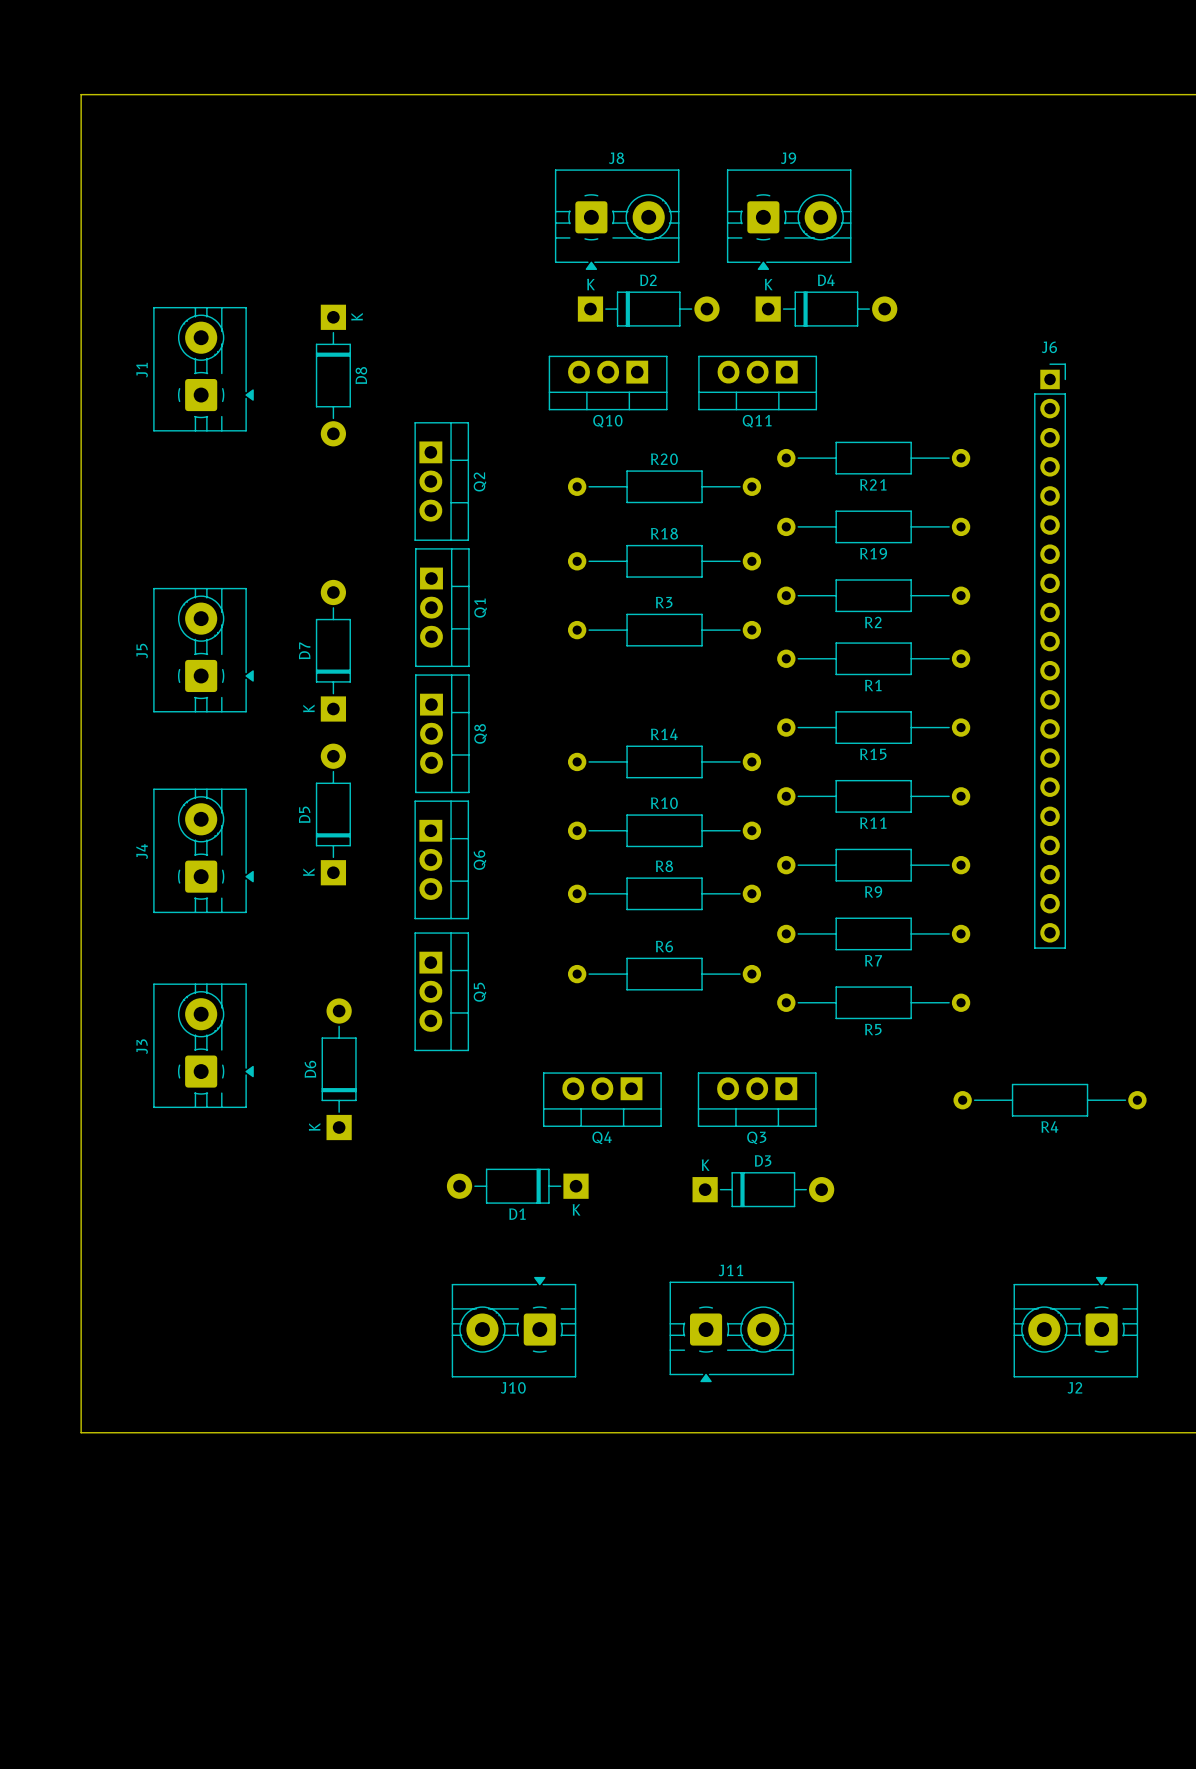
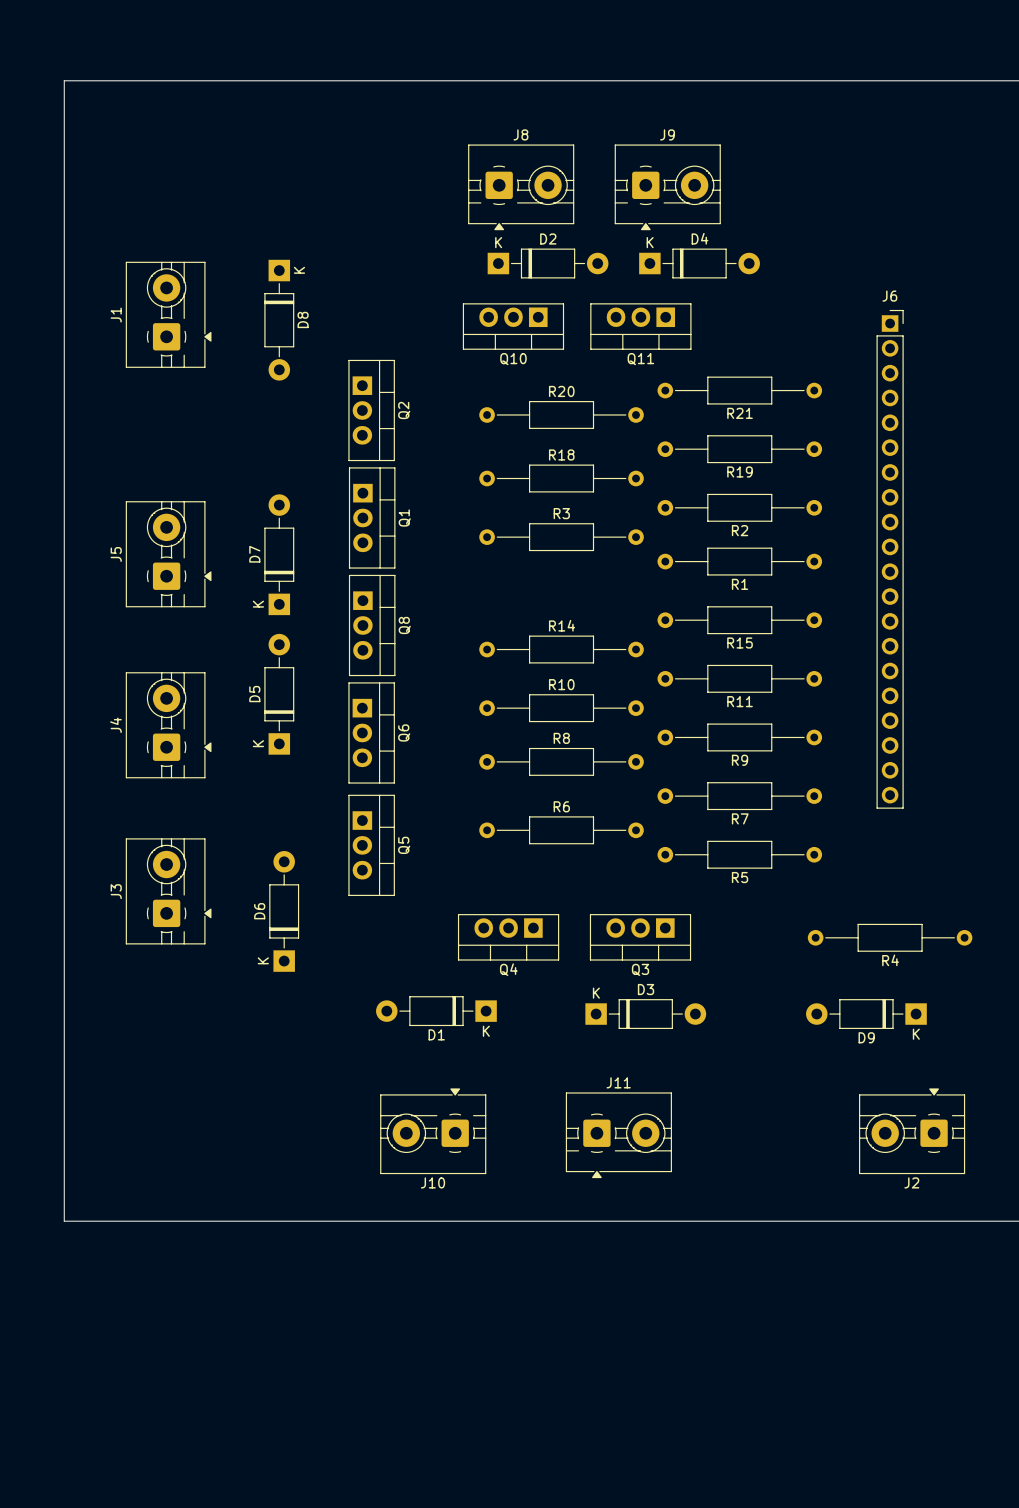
D9: none -> (866, 1014)

